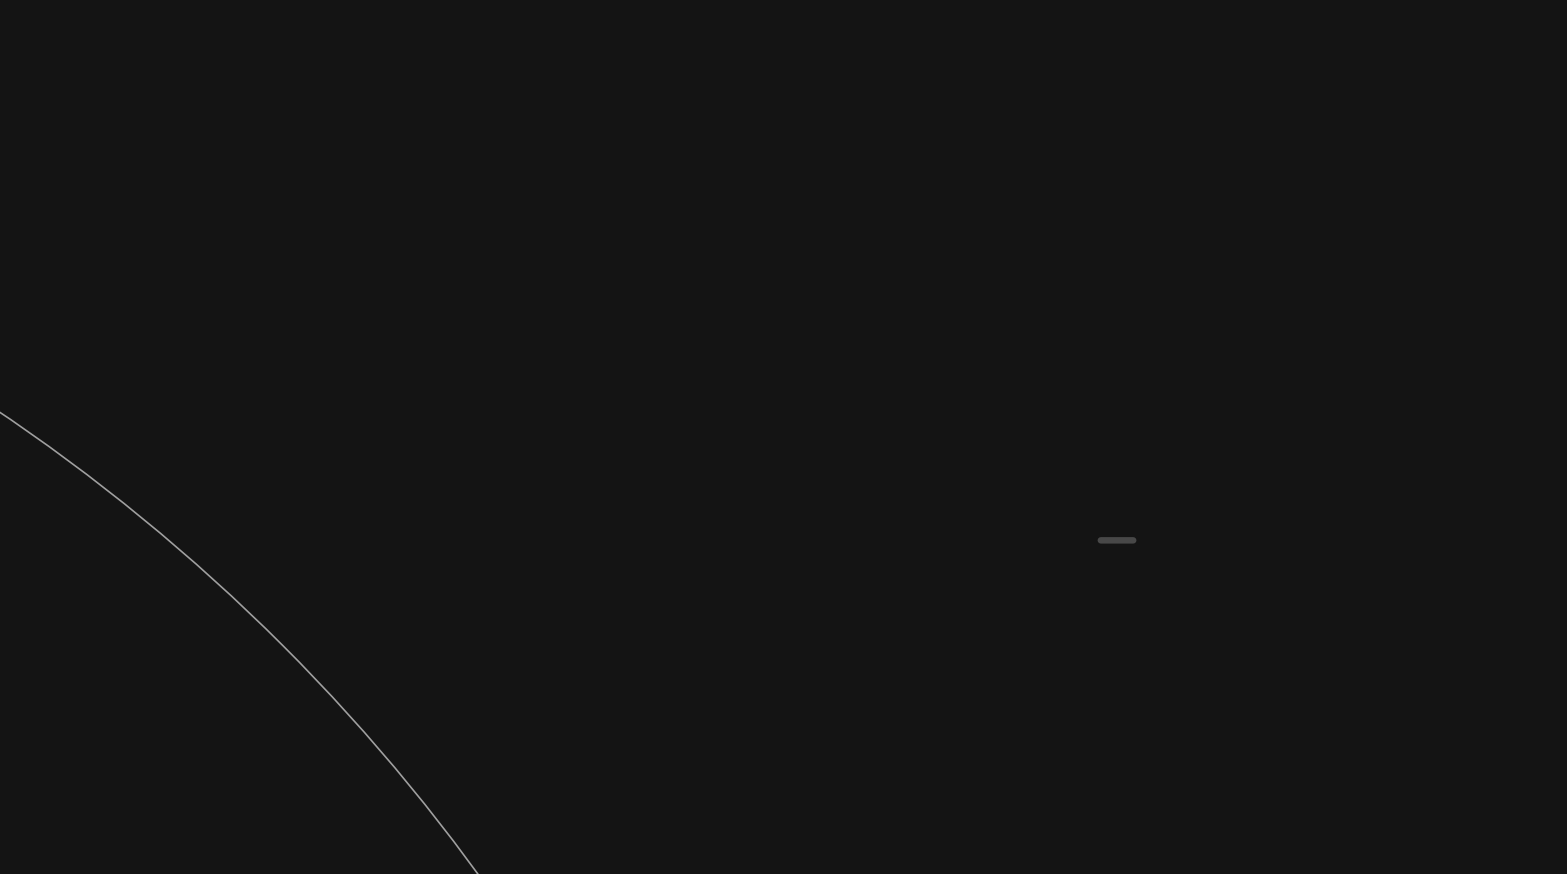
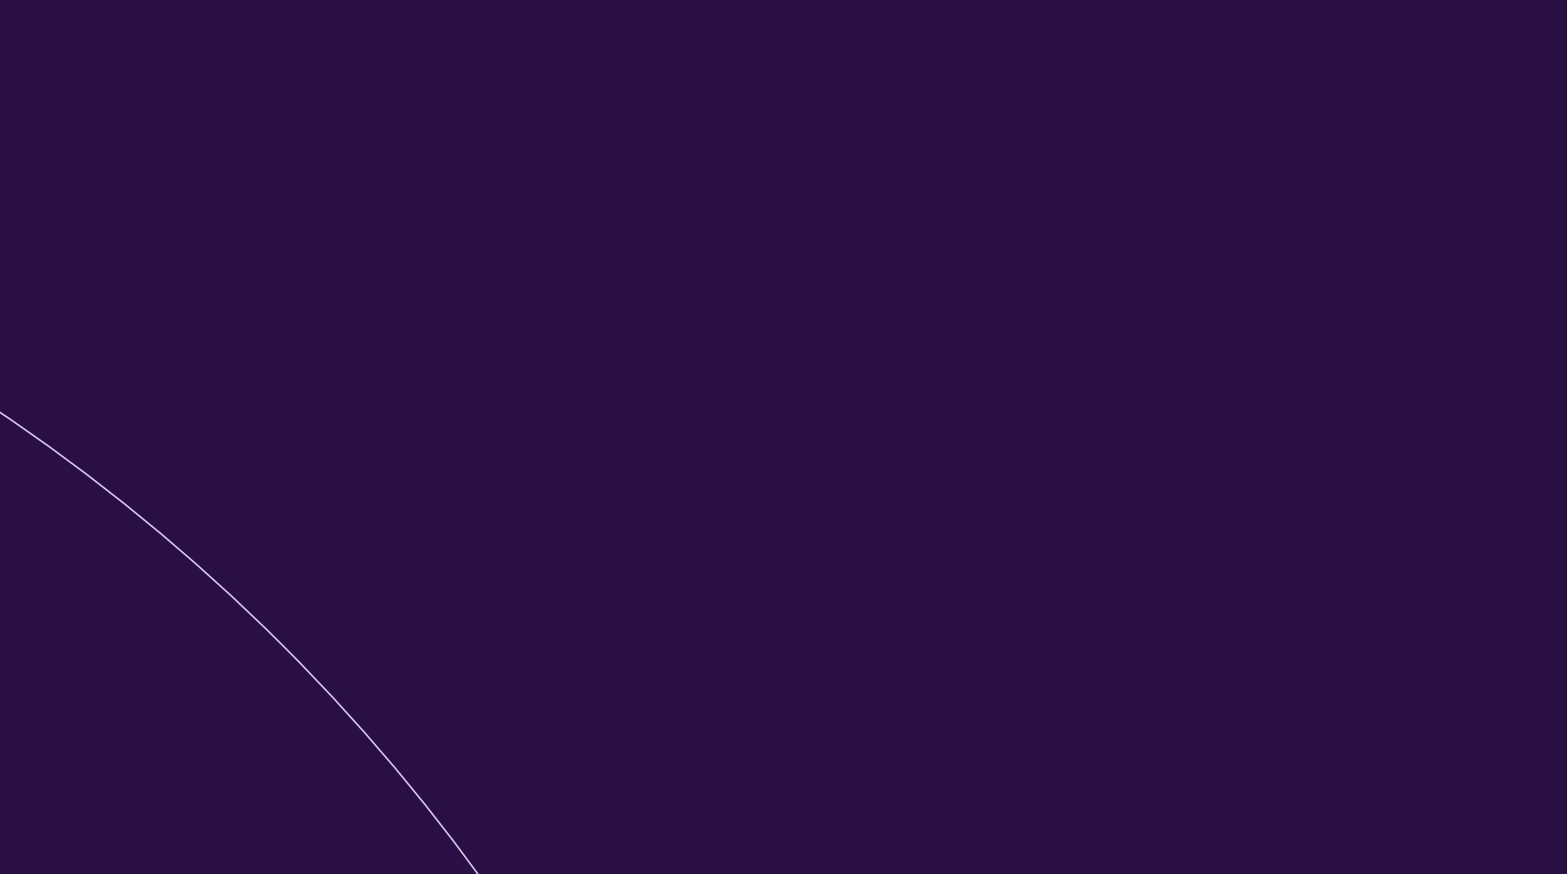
track: (1133, 540) (1100, 540) -> none

